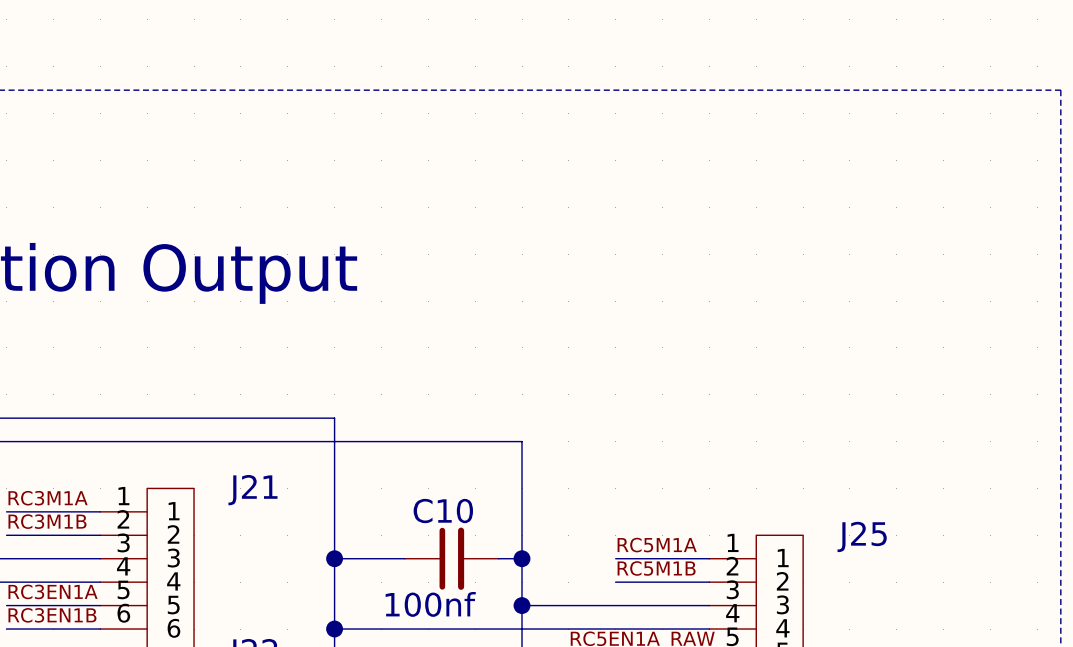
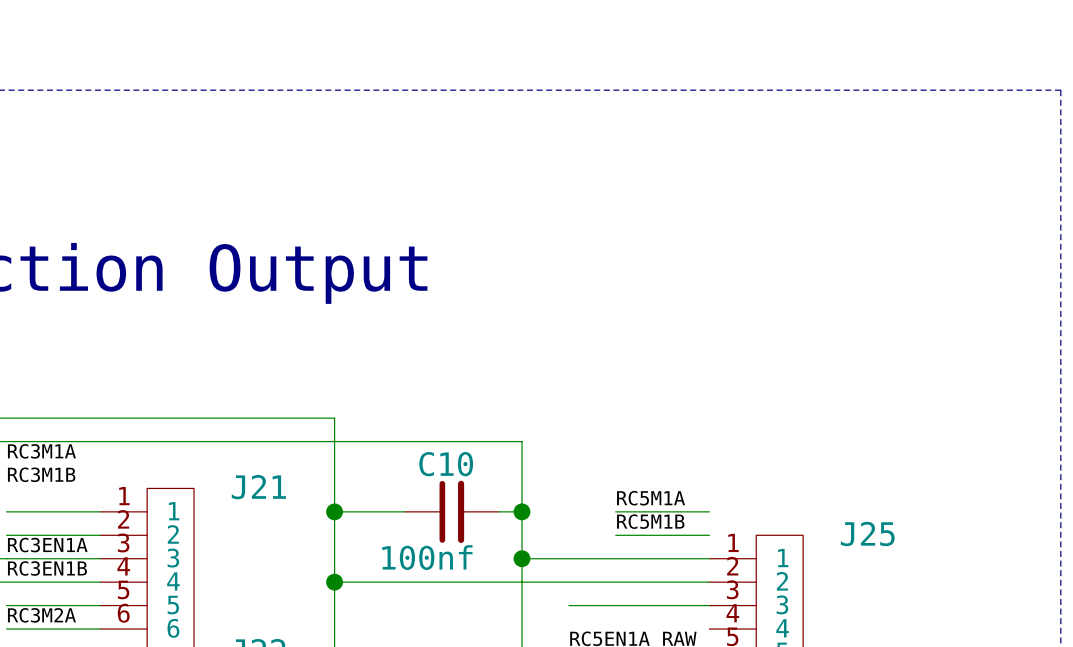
label position: RC3M1A (48, 498) -> RC3M1A (41, 451)
junction: none -> (334, 511)
wire: none -> (498, 511) (522, 511)
junction: none -> (522, 511)
wire: none -> (615, 511) (709, 511)
label position: RC3M1B (47, 521) -> RC3M1B (41, 474)
wire: none -> (615, 535) (709, 535)
label position: RC5M1A (657, 545) -> RC5M1A (651, 498)
wire: (334, 558) (404, 558) -> (334, 511) (404, 511)
junction: (334, 558) -> none
C10 position: (451, 558) -> (451, 511)
wire: (498, 558) (522, 558) -> (615, 558) (522, 558)
label: none -> RC3EN1B (47, 568)
label position: RC5M1B (656, 568) -> RC5M1B (650, 521)
wire: none -> (334, 582) (615, 582)
junction: none -> (334, 582)
label position: RC3EN1A (53, 591) -> RC3EN1A (47, 545)
wire: (522, 605) (568, 605) -> none
junction: (522, 605) -> none
label: RC3EN1B (52, 615) -> RC3M2A (41, 615)
wire: (334, 629) (709, 629) -> none
junction: (334, 629) -> none

